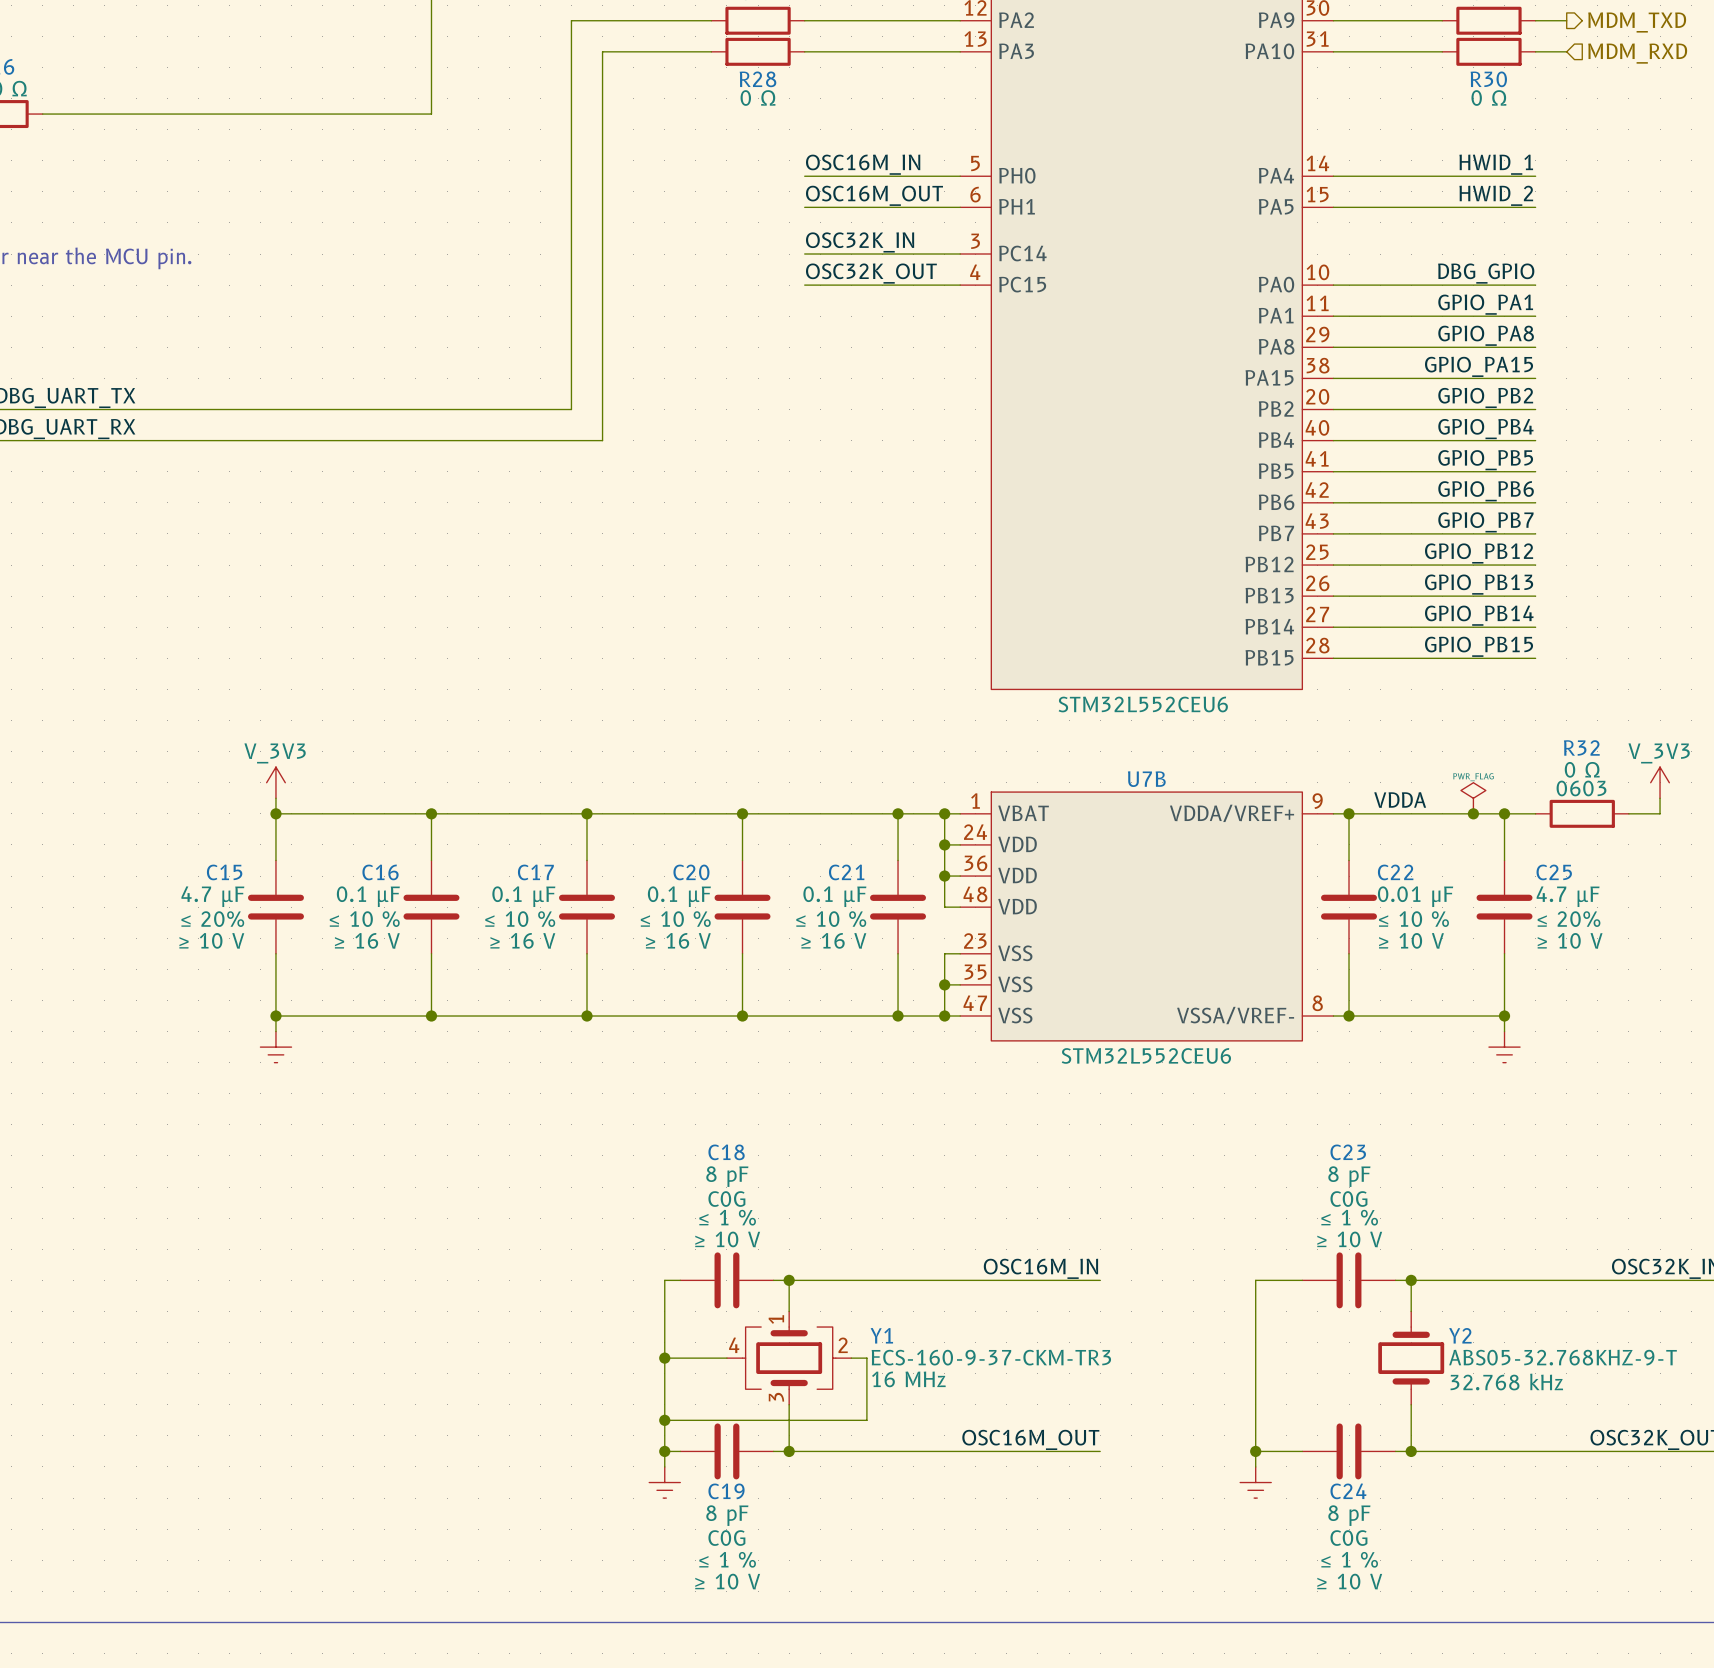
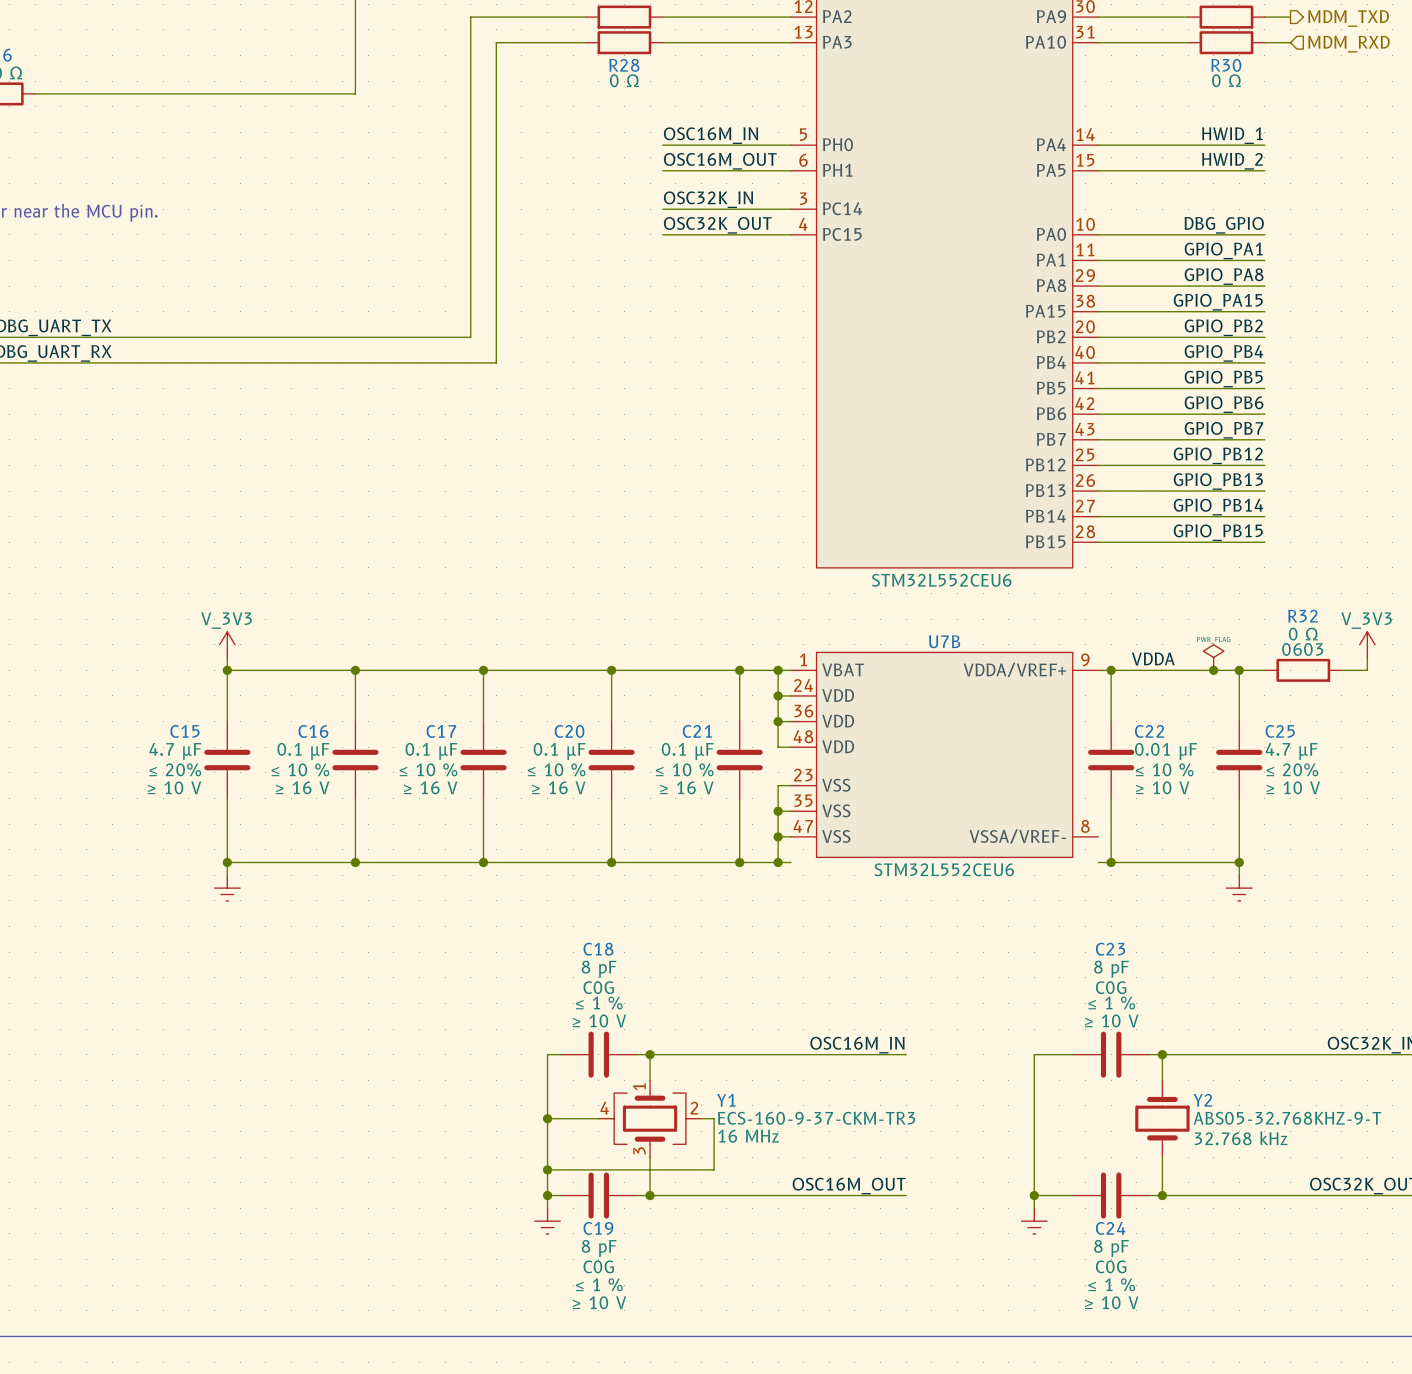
C15 position: (275, 907) -> (227, 760)
C16 position: (431, 907) -> (355, 760)
C17 position: (586, 907) -> (483, 760)
C20 position: (742, 907) -> (611, 760)
C21 position: (898, 907) -> (739, 760)
C22 position: (1349, 907) -> (1111, 760)
C25 position: (1504, 907) -> (1239, 760)
wire: (275, 1016) (944, 1016) -> (778, 862) (778, 836)
junction position: (275, 1016) -> (227, 862)
wire: none -> (355, 836) (355, 862)
junction position: (431, 1016) -> (355, 862)
wire: none -> (483, 836) (483, 862)
junction position: (586, 1016) -> (483, 862)
wire: none -> (611, 836) (611, 862)
junction position: (742, 1016) -> (611, 862)
wire: none -> (739, 836) (739, 862)
junction: (898, 1016) -> none
wire: (1333, 1016) (1504, 1016) -> (1098, 862) (1239, 862)
wire: none -> (1111, 836) (1111, 862)
junction position: (1349, 1016) -> (1111, 862)
junction position: (1504, 1016) -> (1239, 862)
wire: none -> (227, 862) (790, 862)
power symbol position: (275, 1047) -> (227, 888)
junction: none -> (739, 862)
junction: none -> (778, 862)
power symbol position: (1504, 1047) -> (1239, 888)

